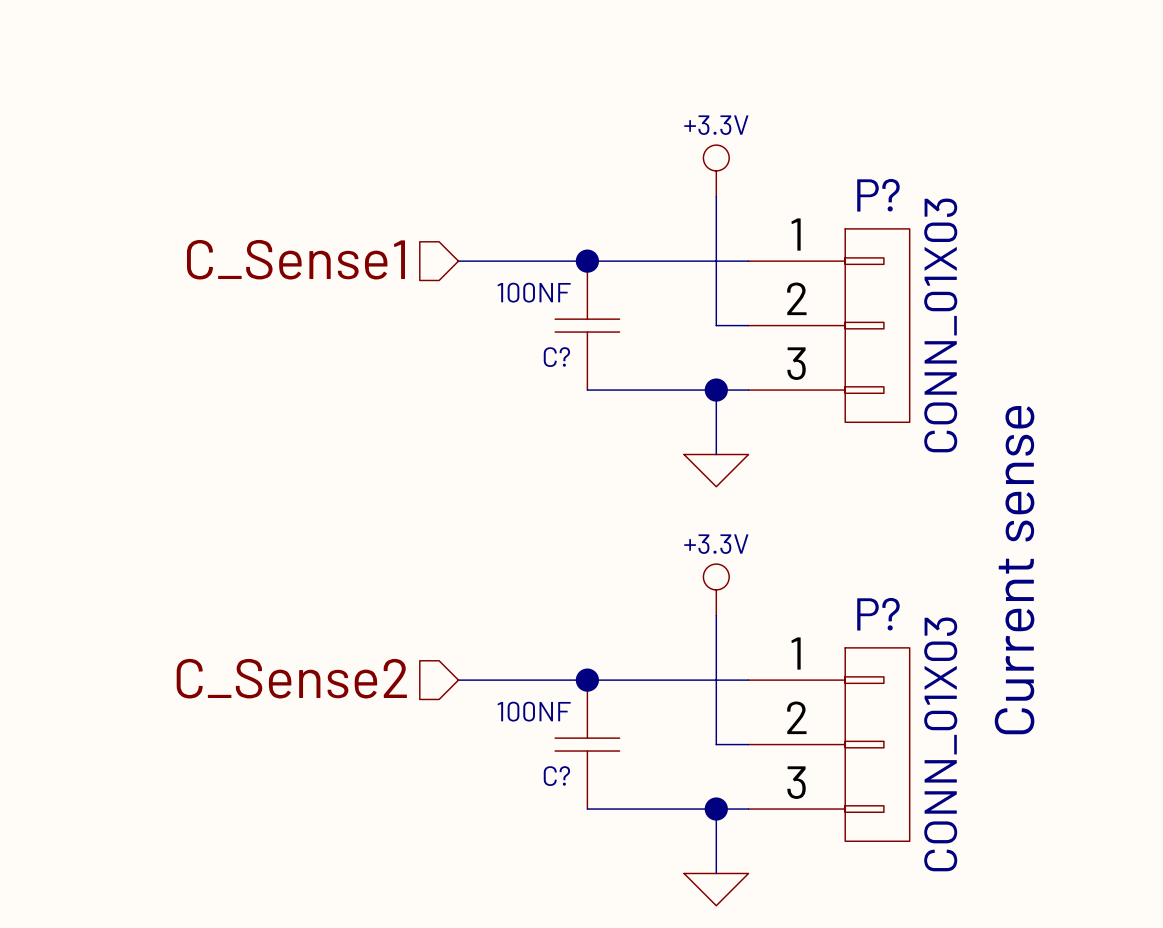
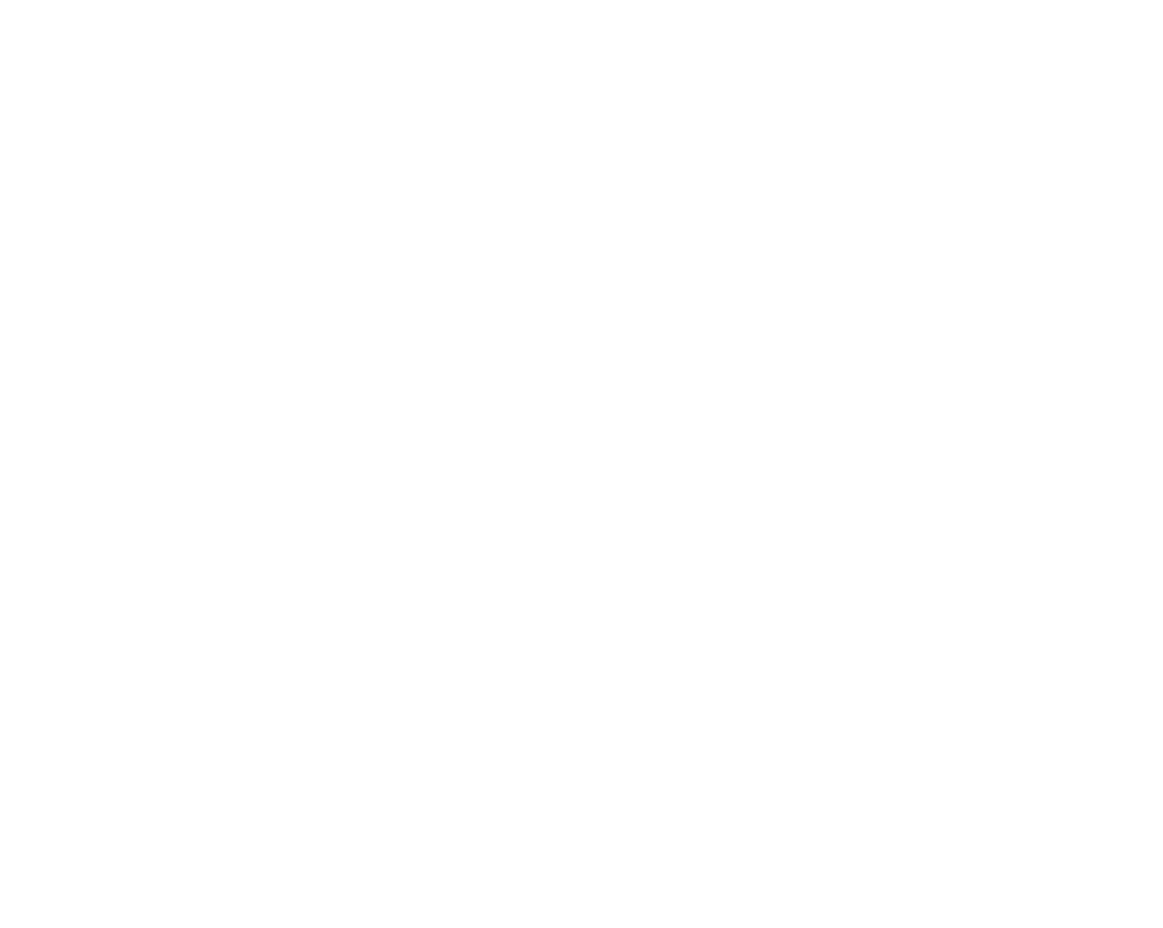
power symbol: +3.3V (716, 170) -> none
wire: (716, 196) (716, 325) (748, 325) -> none
hierarchical label: C_Sense1 (295, 259) -> none
wire: (458, 261) (748, 261) -> none
junction: (587, 261) -> none
C?: 100NF (587, 325) -> none
P?: CONN_01X03 (829, 325) -> none
wire: (587, 390) (748, 390) -> none
wire: (716, 390) (716, 454) -> none
junction: (716, 390) -> none
power symbol: (716, 470) -> none
text: Current sense (1014, 570) -> none
power symbol: +3.3V (716, 589) -> none
wire: (716, 615) (716, 744) (748, 744) -> none
hierarchical label: C_Sense2 (291, 678) -> none
wire: (458, 680) (748, 680) -> none
junction: (587, 680) -> none
C?: 100NF (587, 744) -> none
P?: CONN_01X03 (829, 744) -> none
wire: (587, 809) (748, 809) -> none
wire: (716, 809) (716, 873) -> none
junction: (716, 809) -> none
power symbol: (716, 889) -> none

